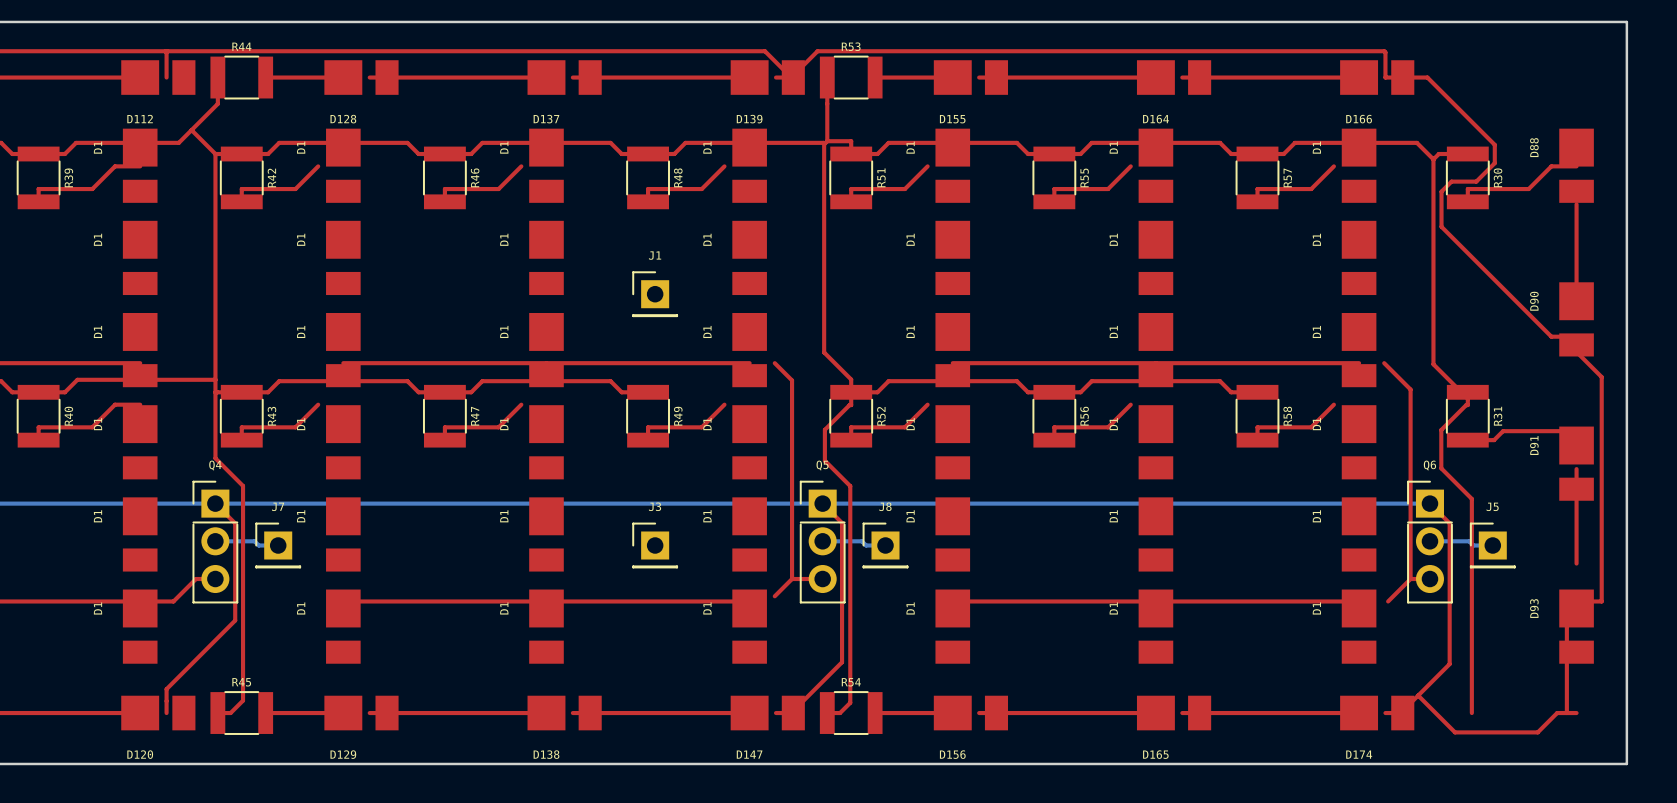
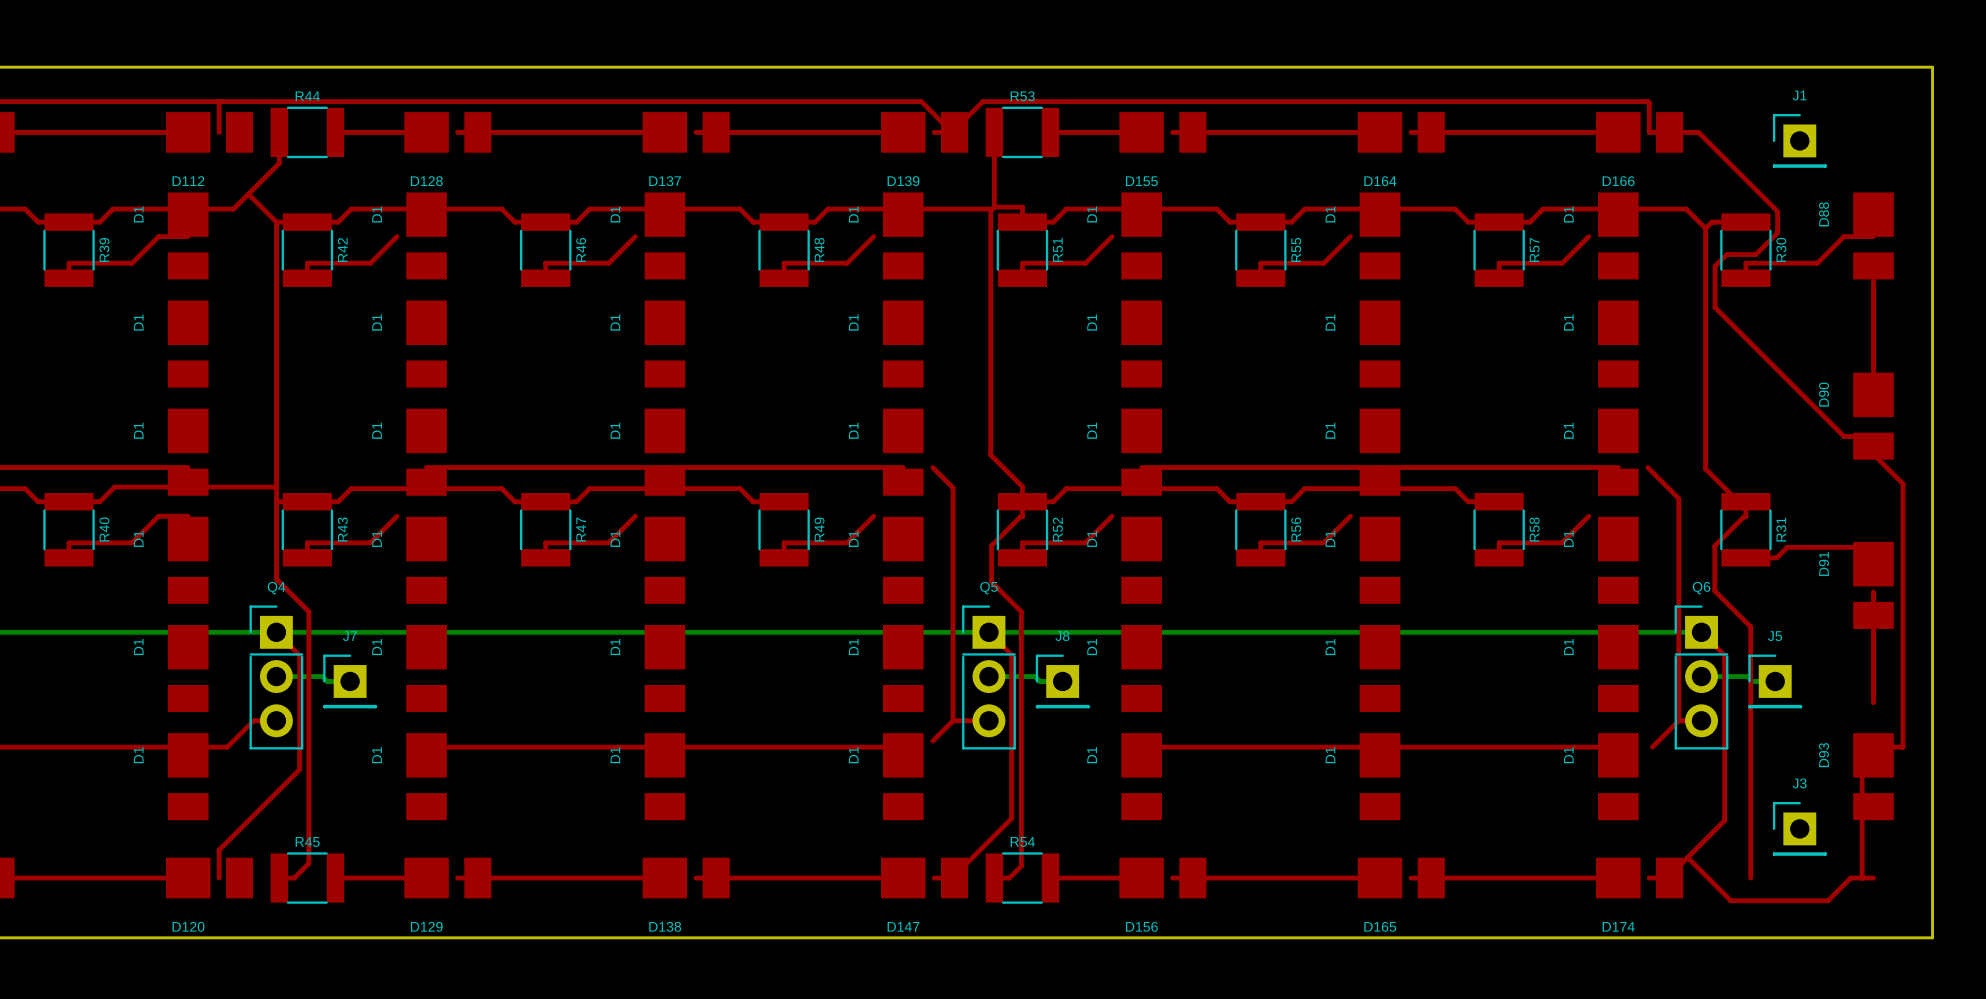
J1 position: (655, 294) -> (1799, 140)
J3 position: (655, 545) -> (1799, 828)

